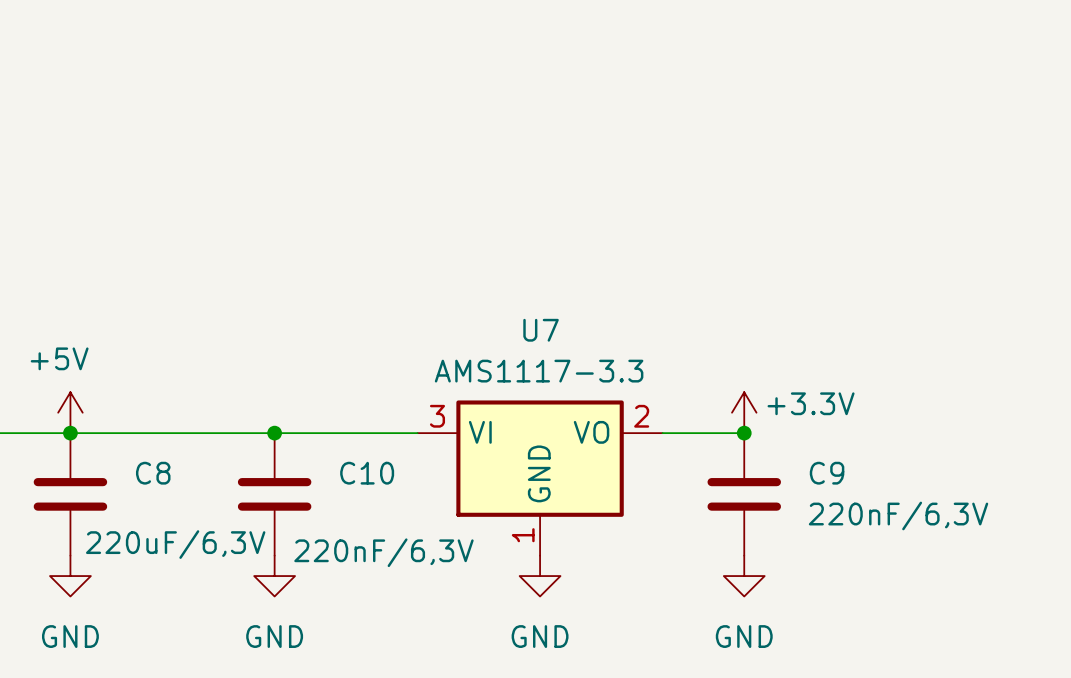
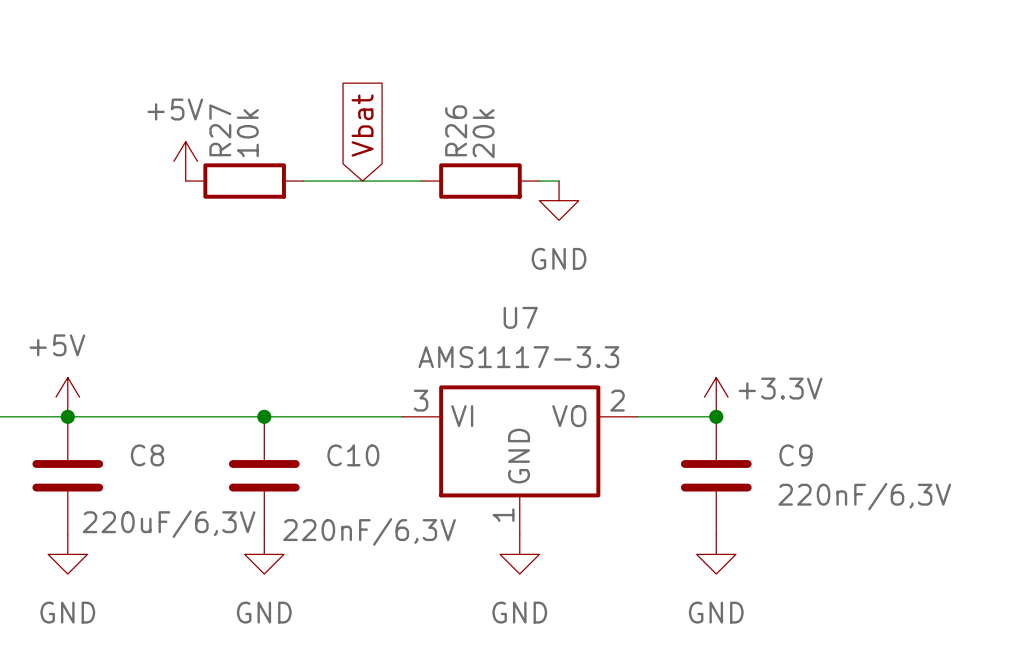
global label: none -> Vbat (362, 125)
power symbol: none -> +5V (185, 161)
R27: none -> 10k (244, 181)
wire: none -> (303, 181) (421, 181)
R26: none -> 20k (480, 181)
wire: none -> (539, 181) (559, 181)
power symbol: none -> GND (559, 200)

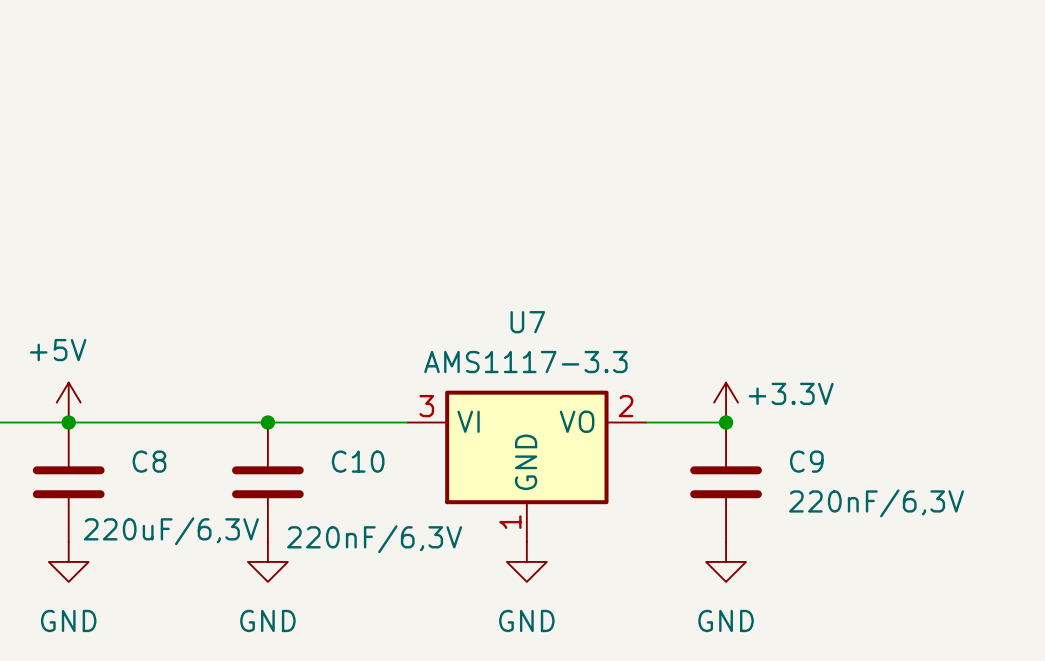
global label: Vbat (362, 125) -> none
power symbol: +5V (185, 161) -> none
R27: 10k (244, 181) -> none
wire: (303, 181) (421, 181) -> none
R26: 20k (480, 181) -> none
wire: (539, 181) (559, 181) -> none
power symbol: GND (559, 200) -> none

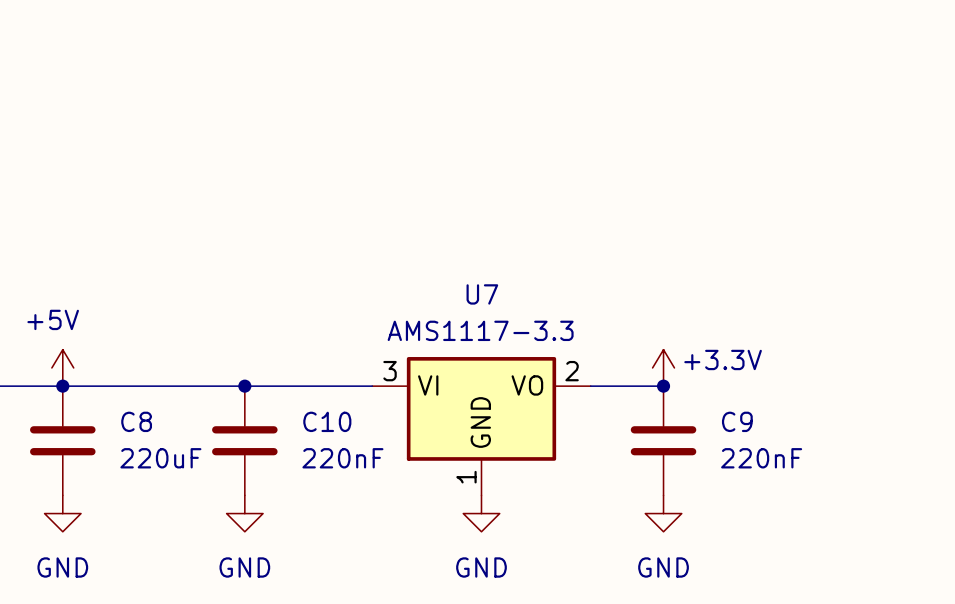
C9 value: 220nF/6,3V (876, 503) -> 220nF (761, 458)
C8 value: 220uF/6,3V (171, 531) -> 220uF (160, 458)
C10 value: 220nF/6,3V (374, 539) -> 220nF (342, 458)

